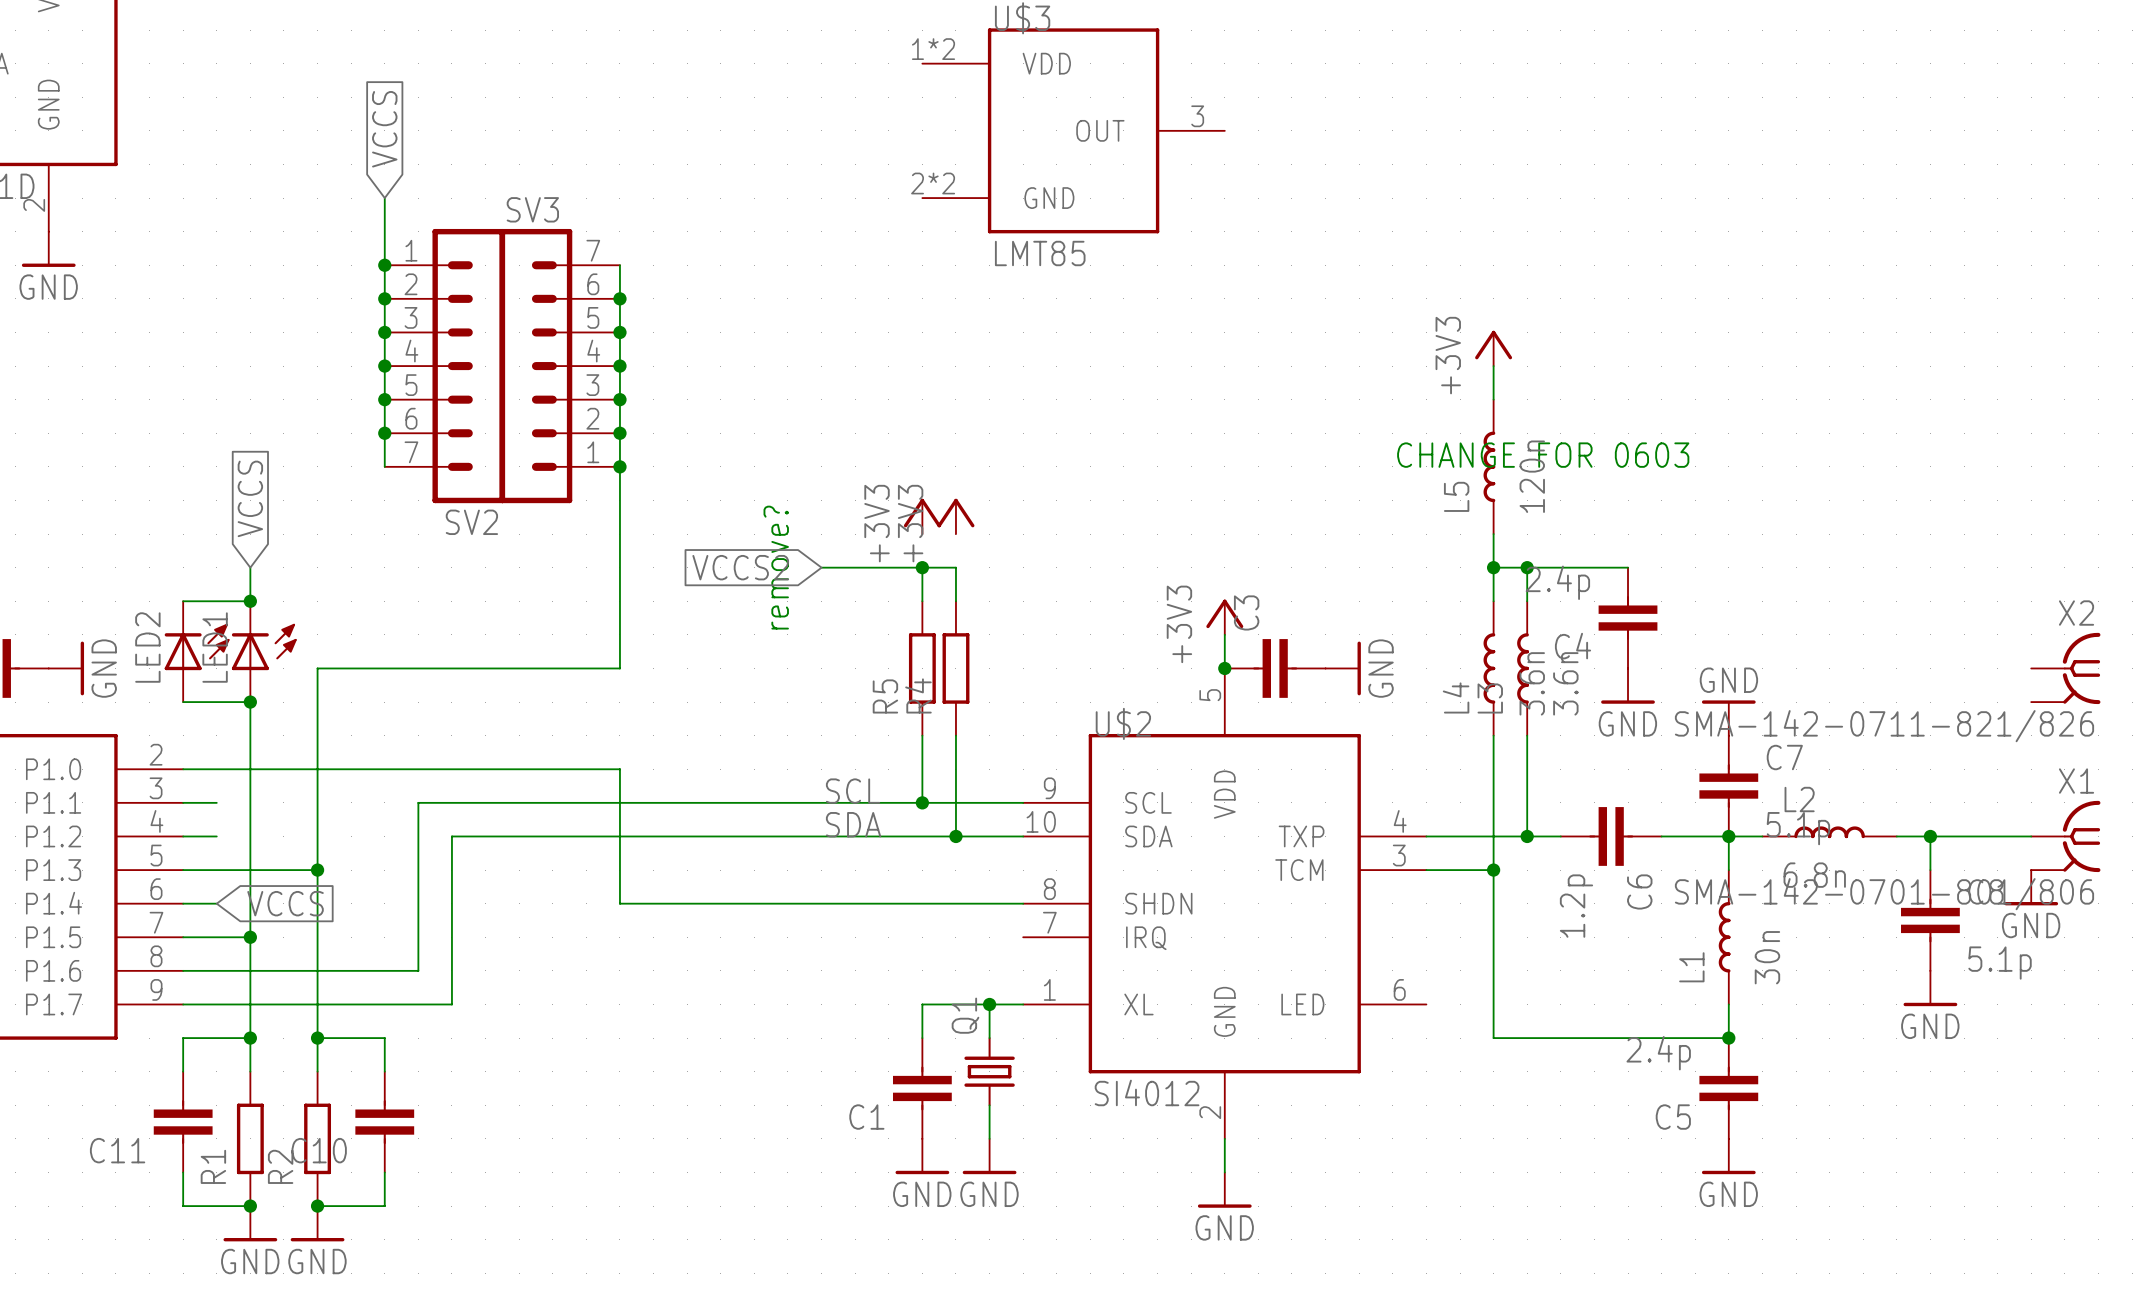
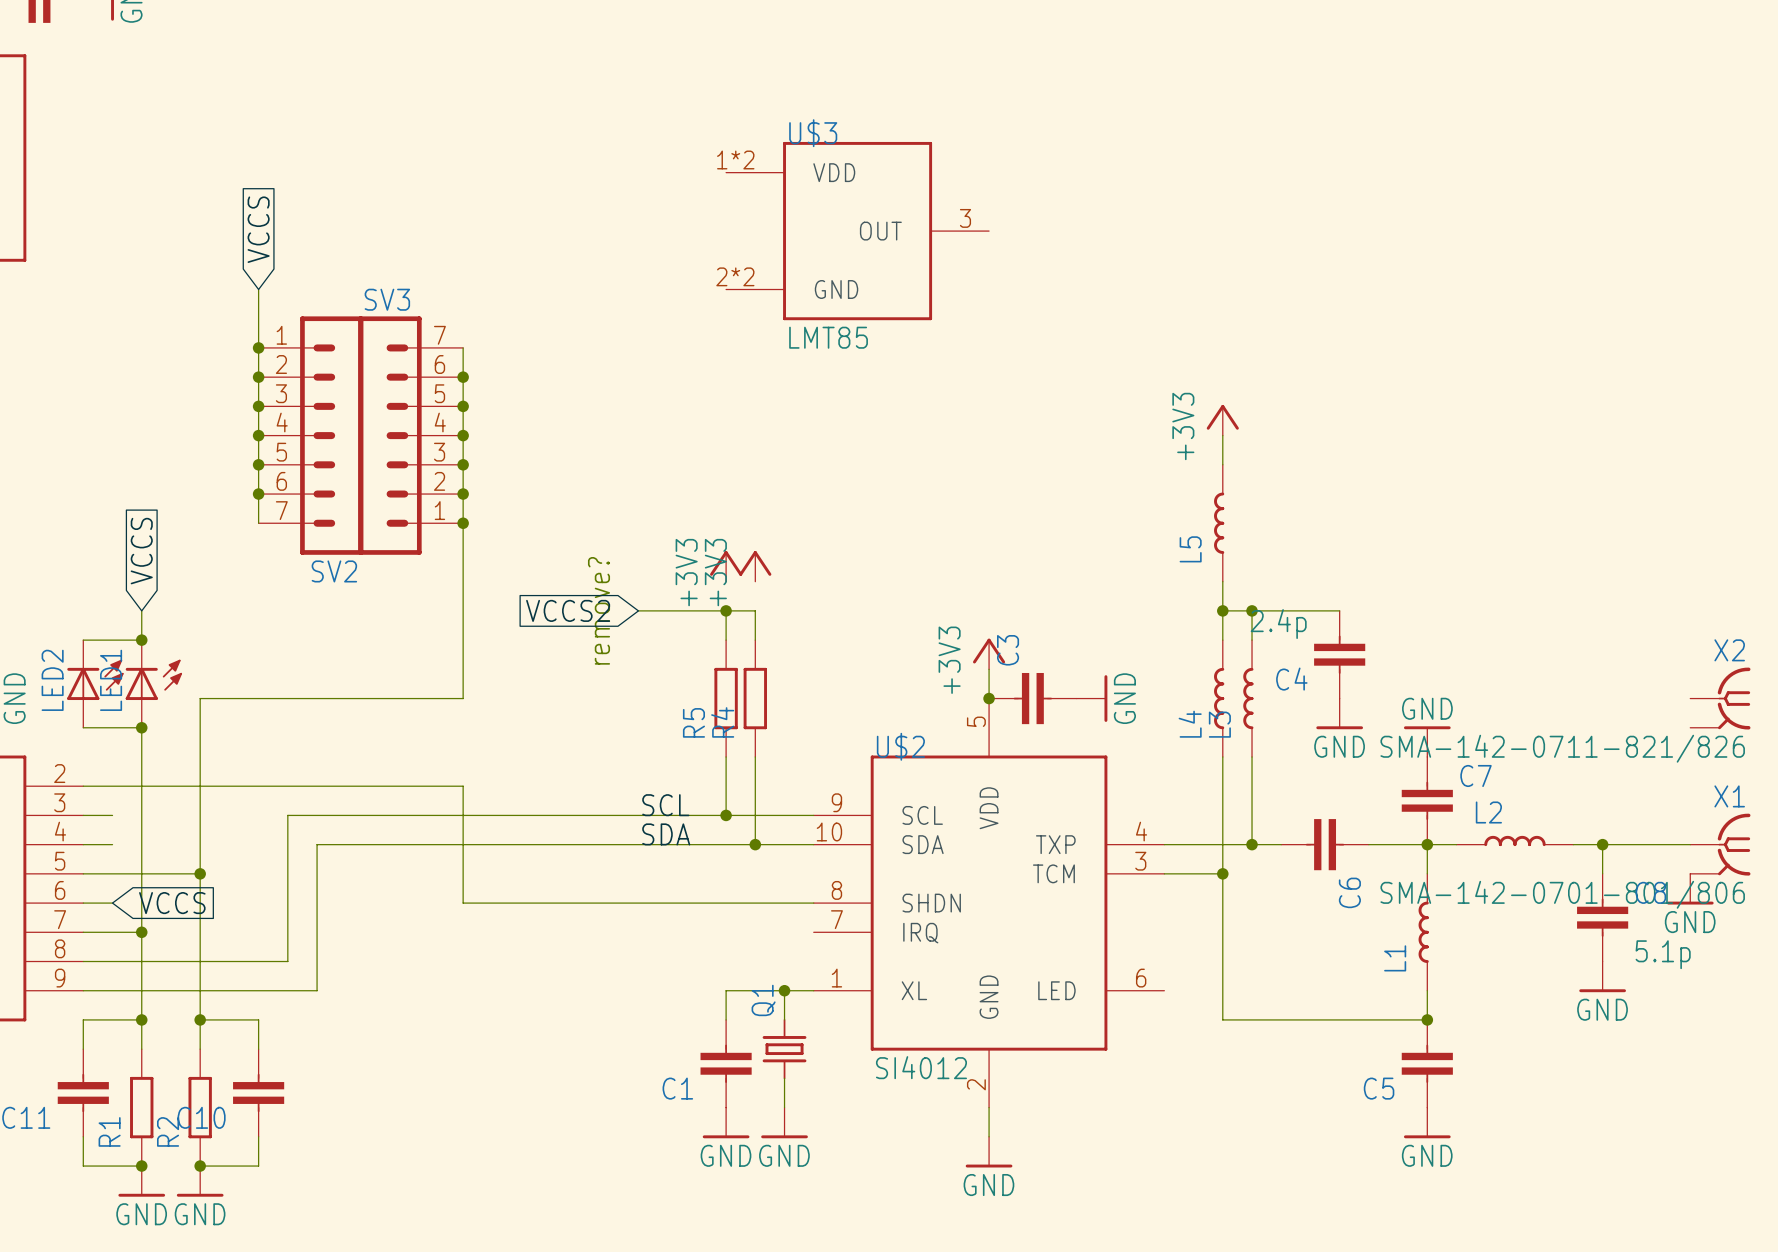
text: CHANGE FOR 0603 (1543, 455) -> none
L5 value: 120n (1532, 476) -> none
L4 value: 3.6n (1532, 683) -> none
L3 value: 3.6n (1565, 683) -> none
C7 value: 5.1p (1798, 828) -> none
L2 value: 6.8n (1814, 875) -> none
C6 value: 1.2p (1576, 906) -> none
L1 value: 30n (1767, 957) -> none
C5 value: 2.4p (1658, 1053) -> none

